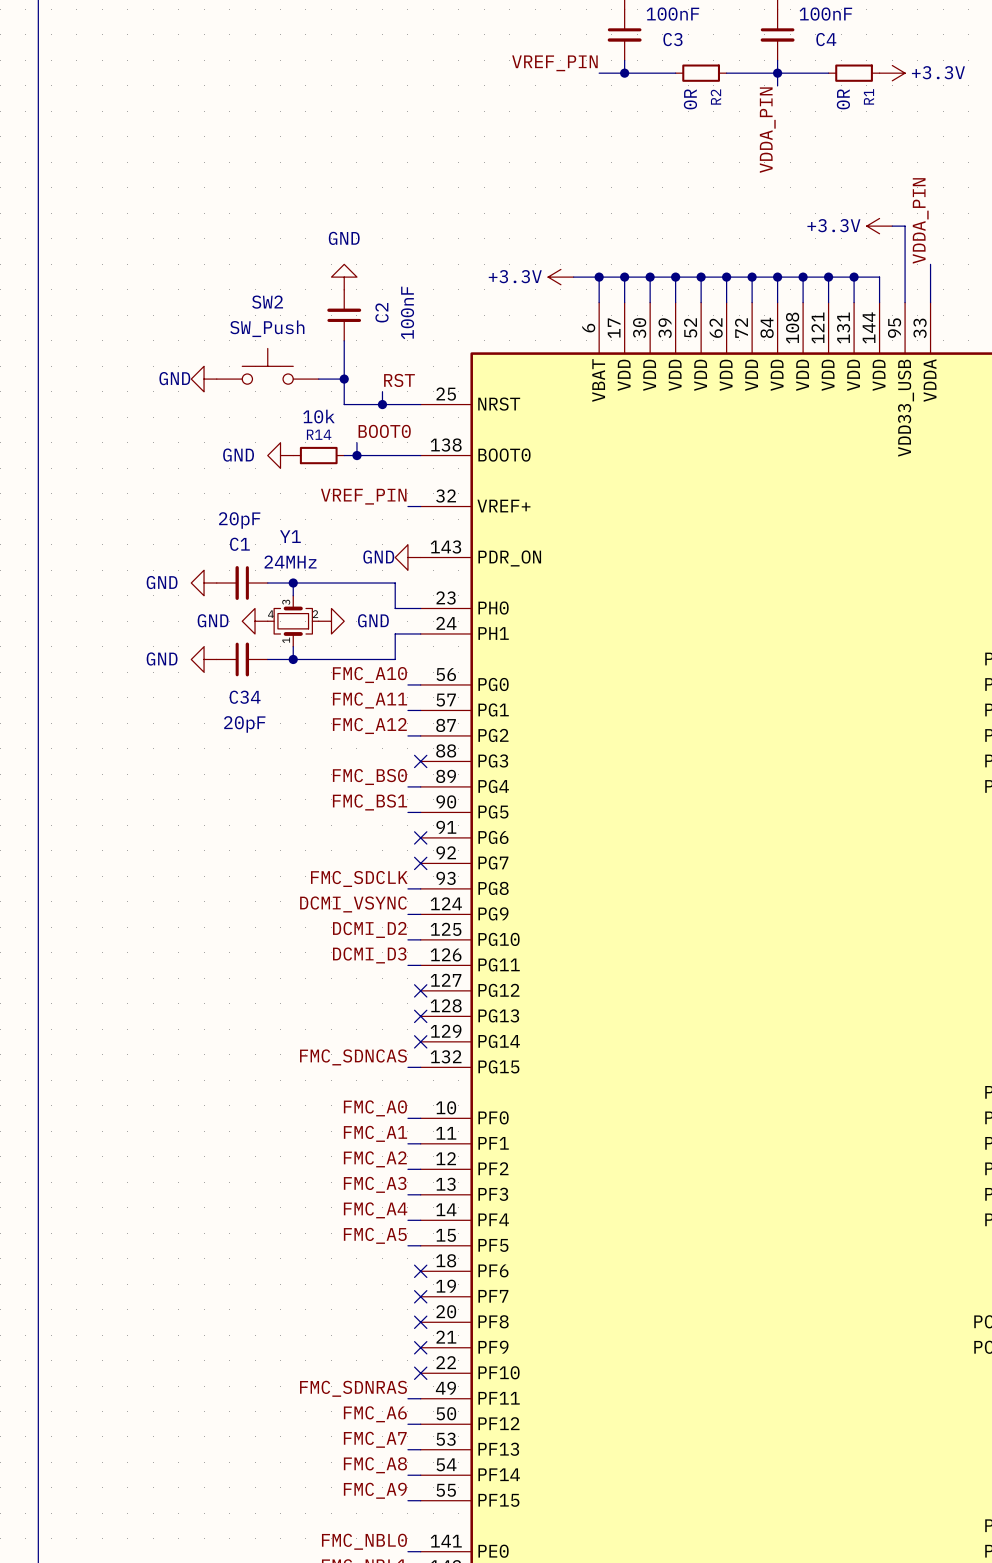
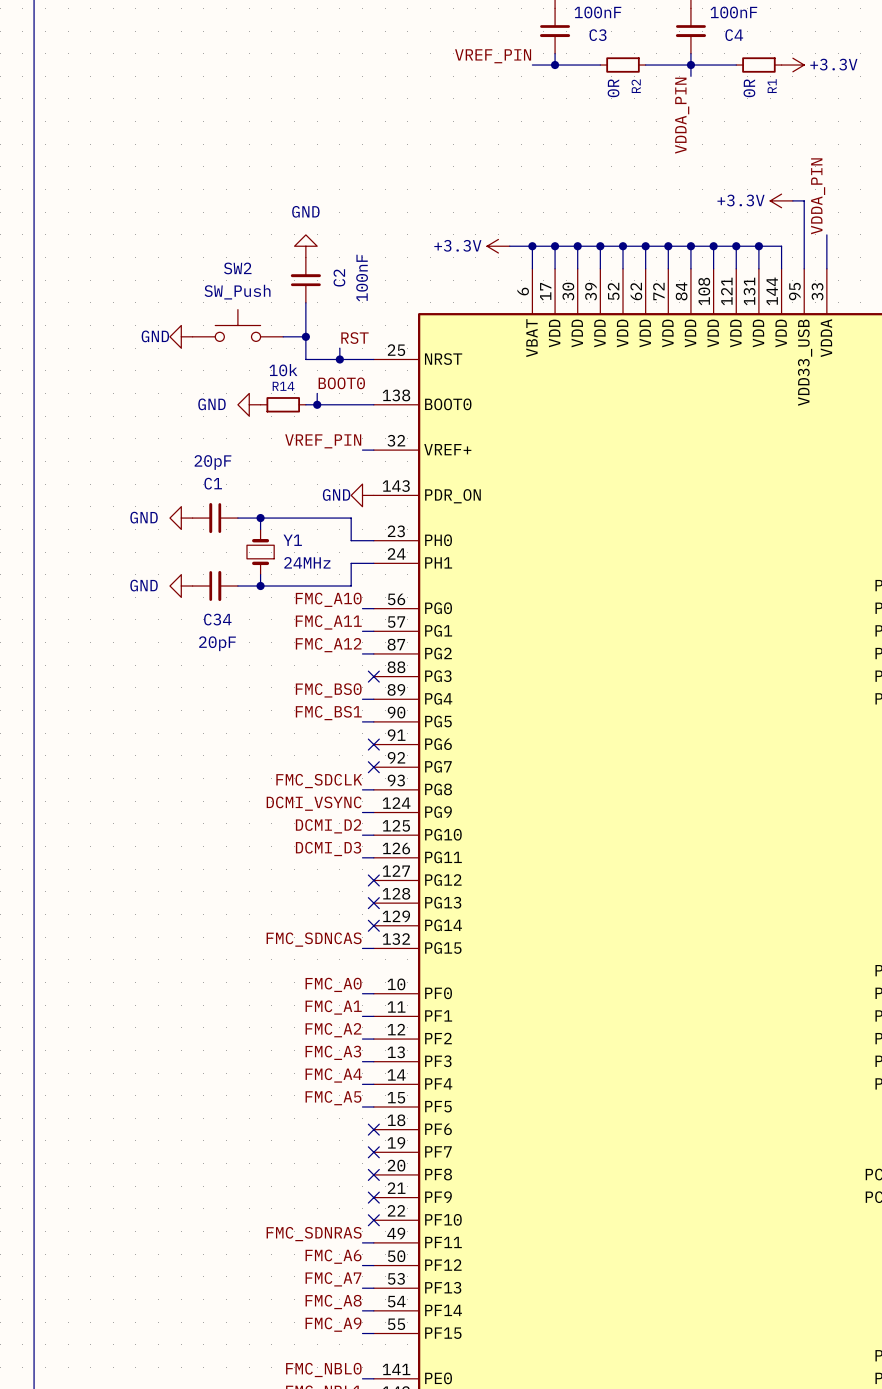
Y1 name position: Y1 (290, 536) -> Y1 (292, 540)
Y1 value position: 24MHz (290, 562) -> 24MHz (307, 562)
Y1 symbol: [267, 595, 319, 647] -> [246, 529, 275, 575]
power symbol: GND (255, 621) -> none
power symbol: GND (331, 621) -> none

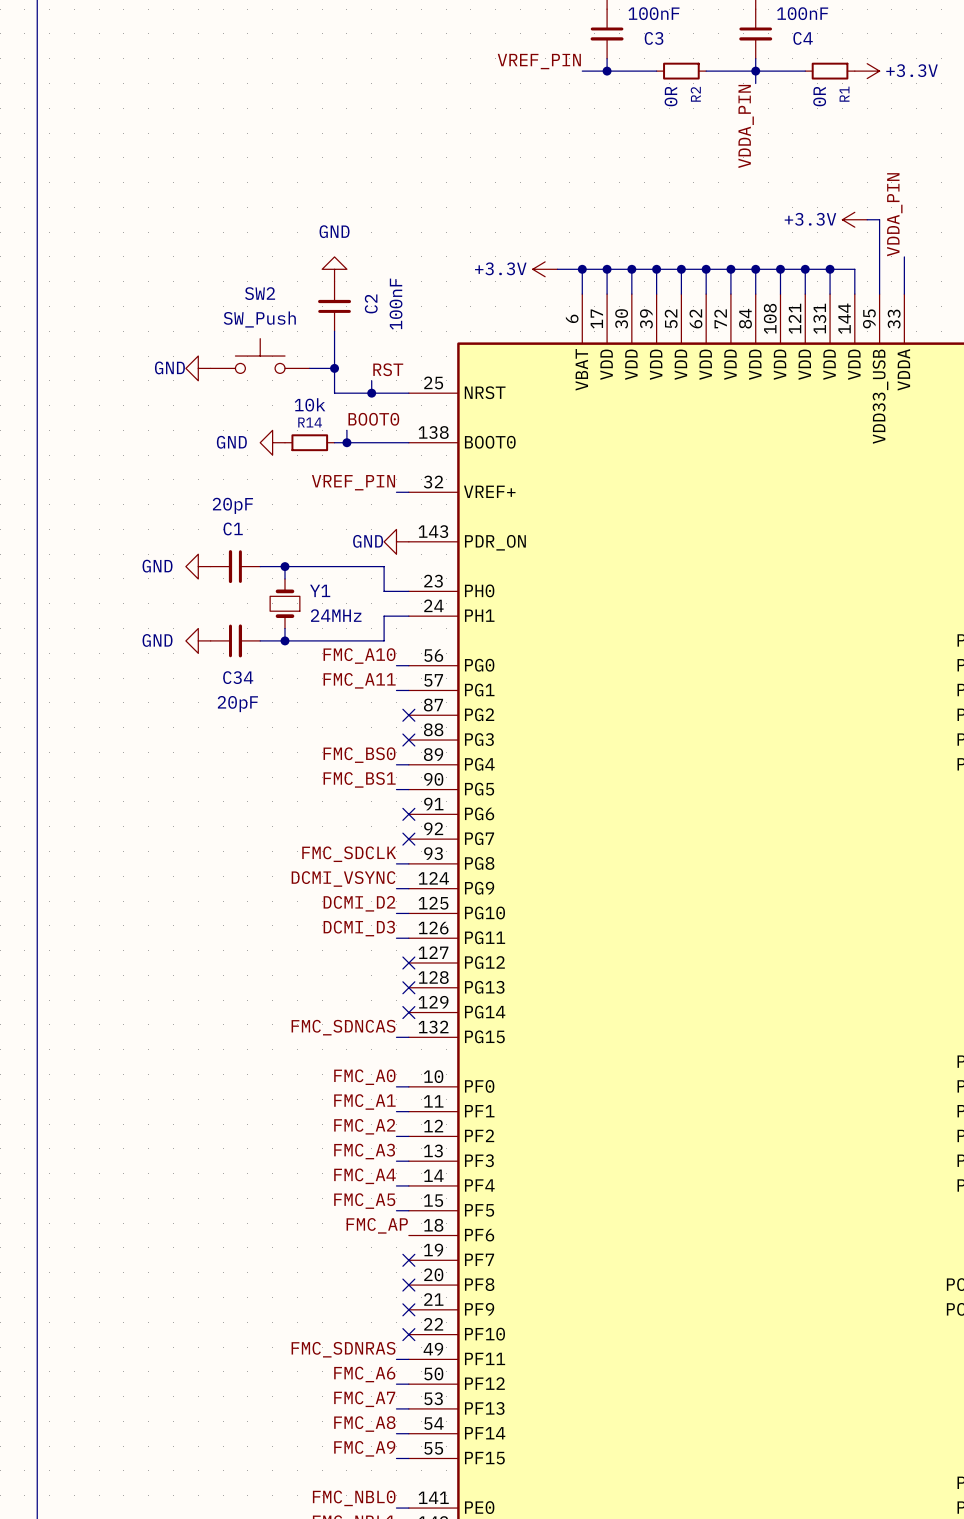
label: FMC_A12 (328, 645) -> none
wire: (362, 653) (373, 653) -> none
no-connect mark: none -> (408, 715)
label: none -> FMC_AP (377, 1225)
no-connect mark: (373, 1129) -> none

